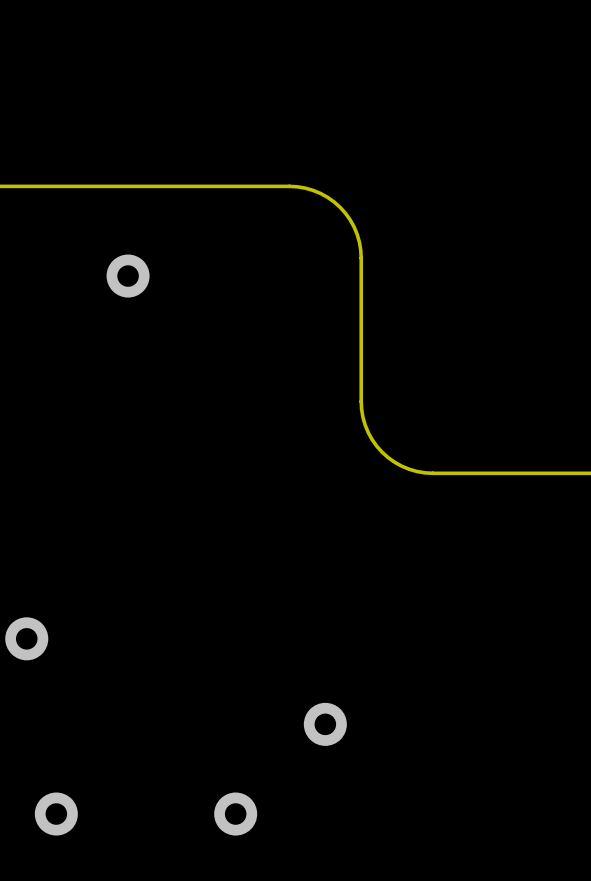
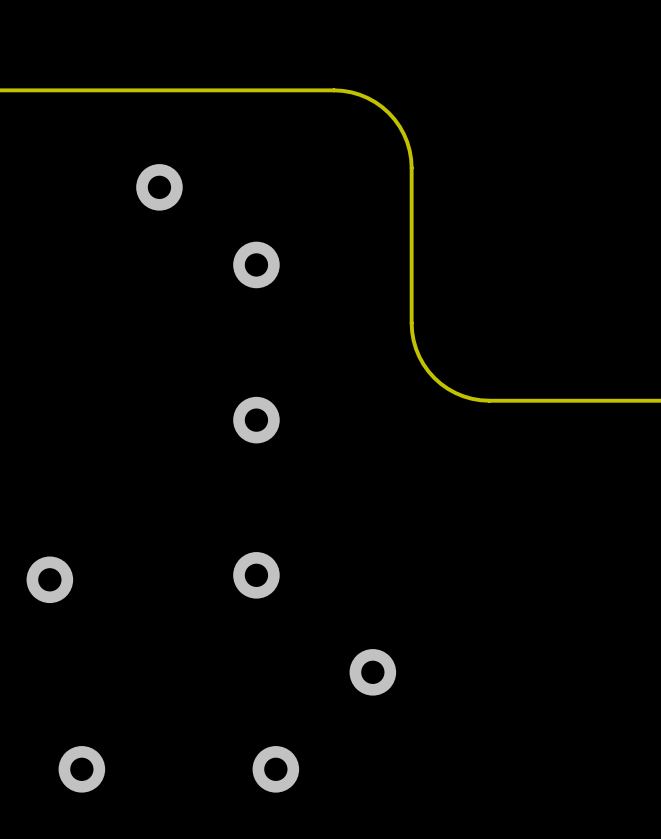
via: none -> (256, 264)
via: none -> (256, 420)
via: none -> (256, 575)

